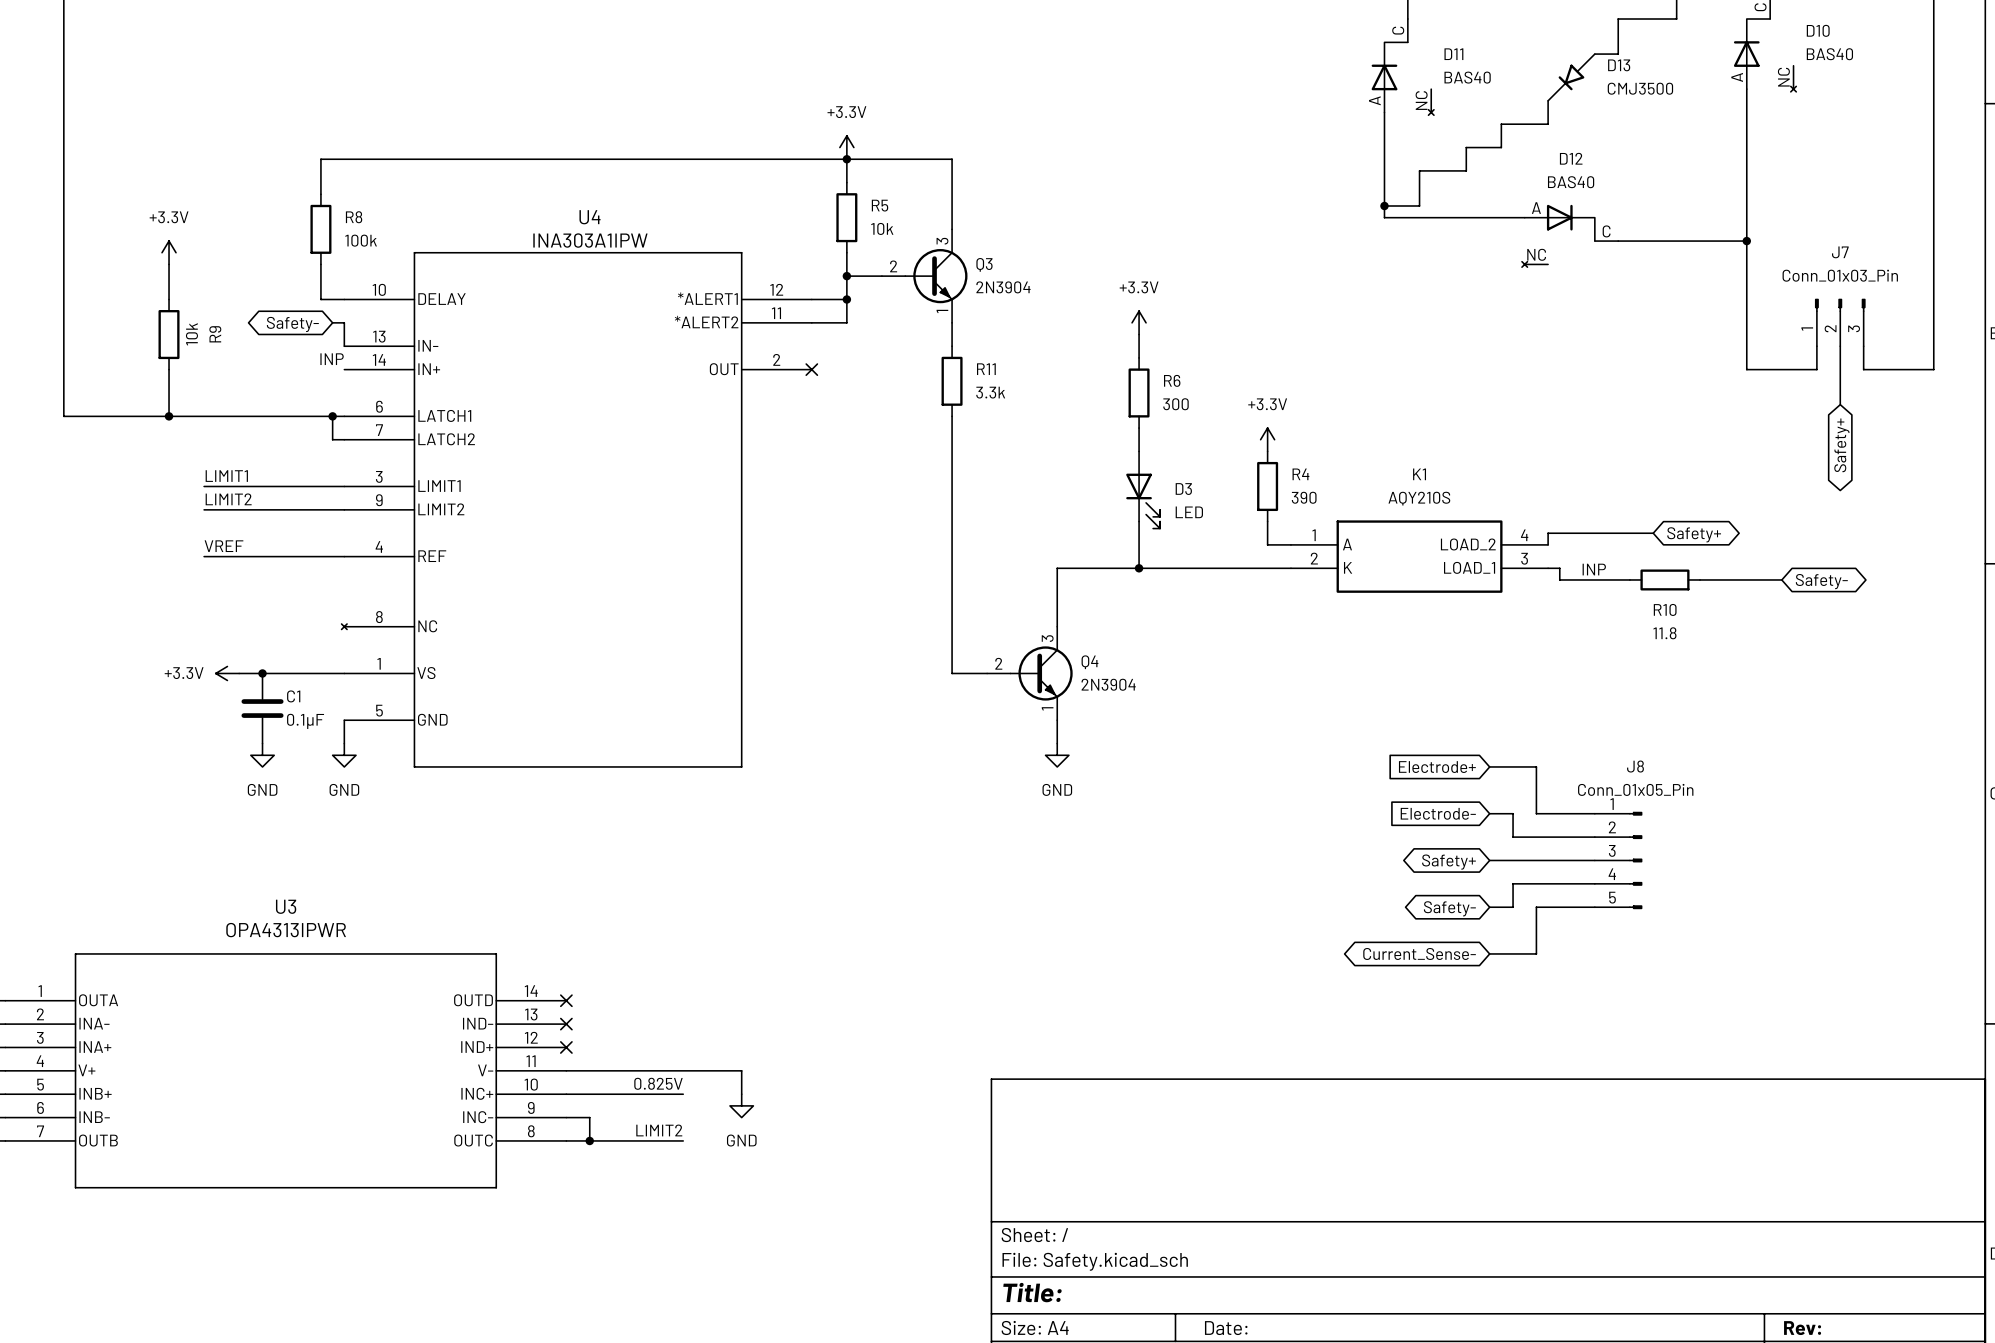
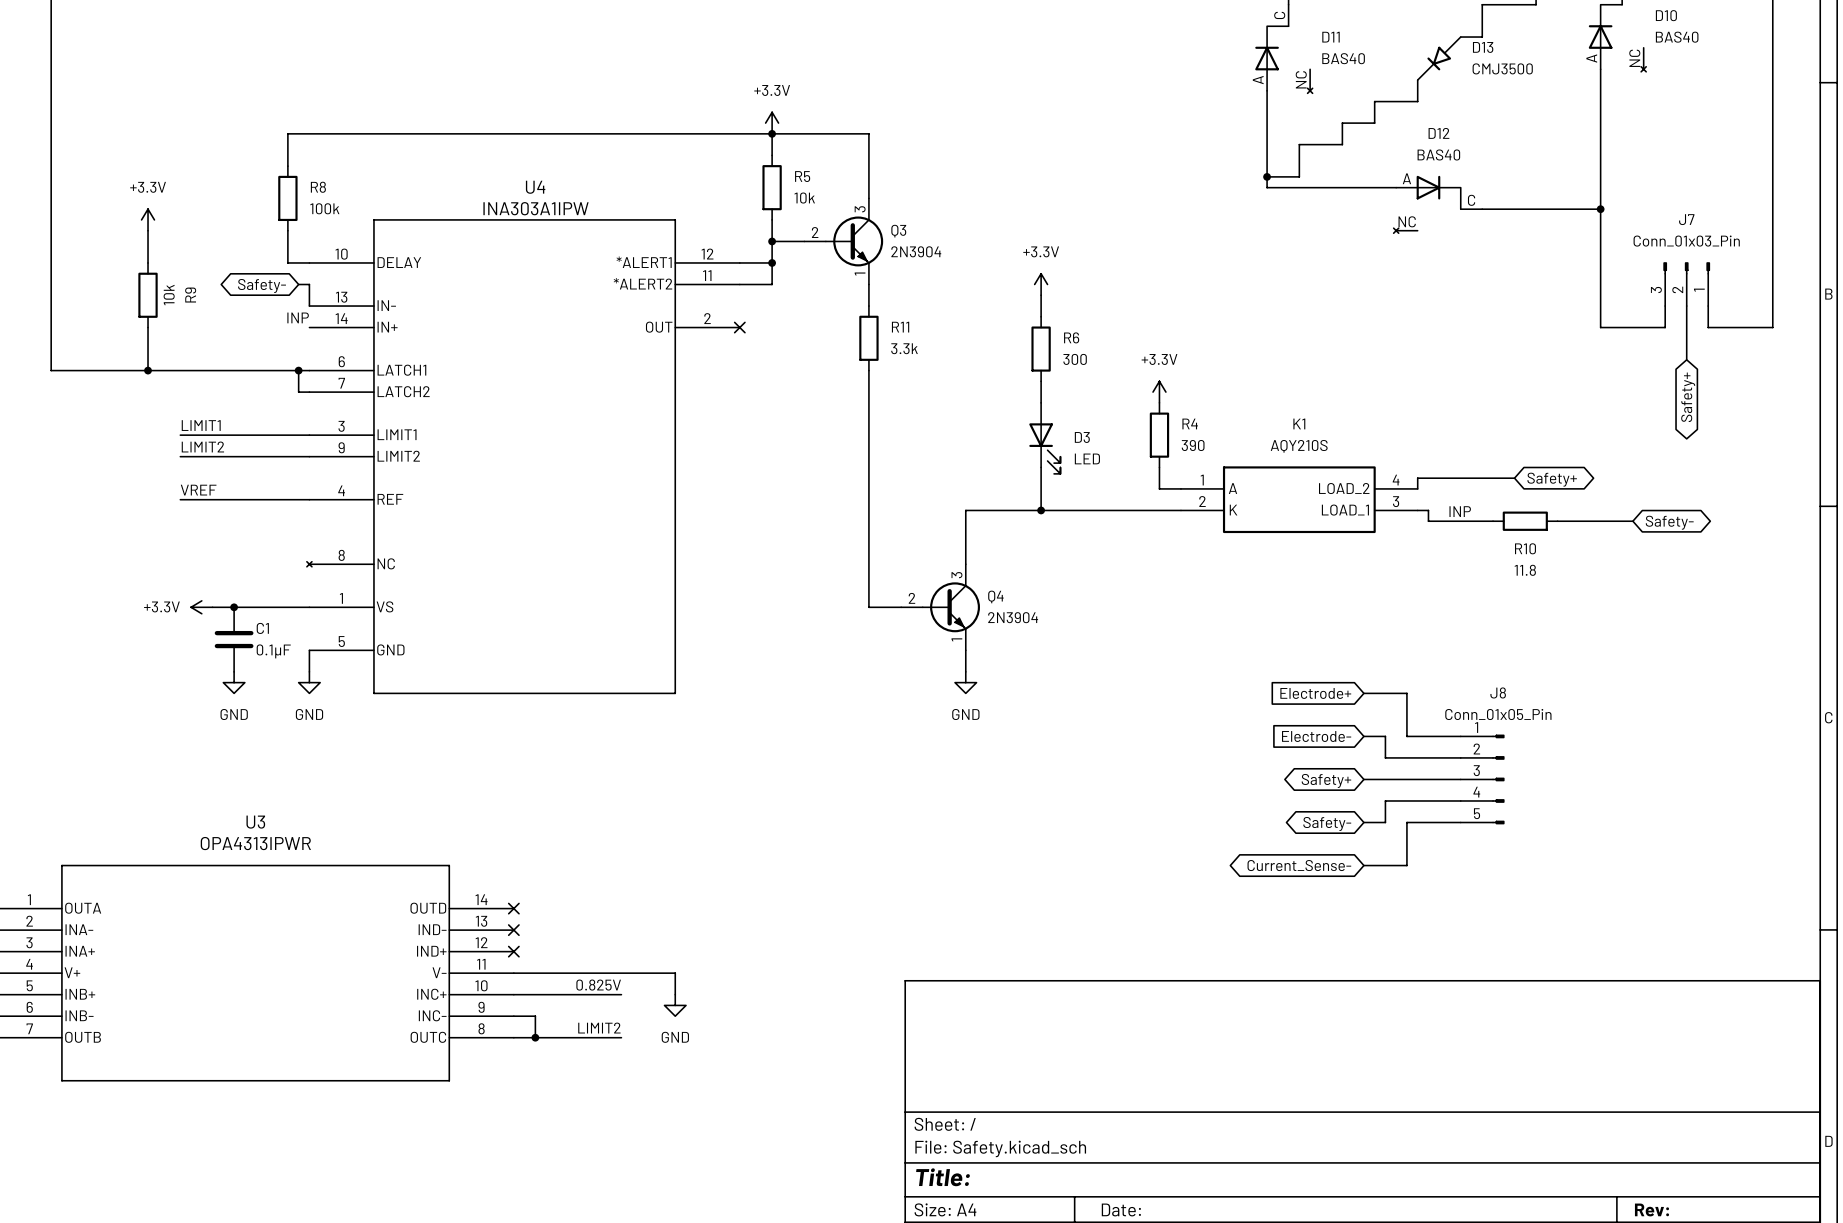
J7 flip: as is (1840, 305) -> left-right (1686, 268)

